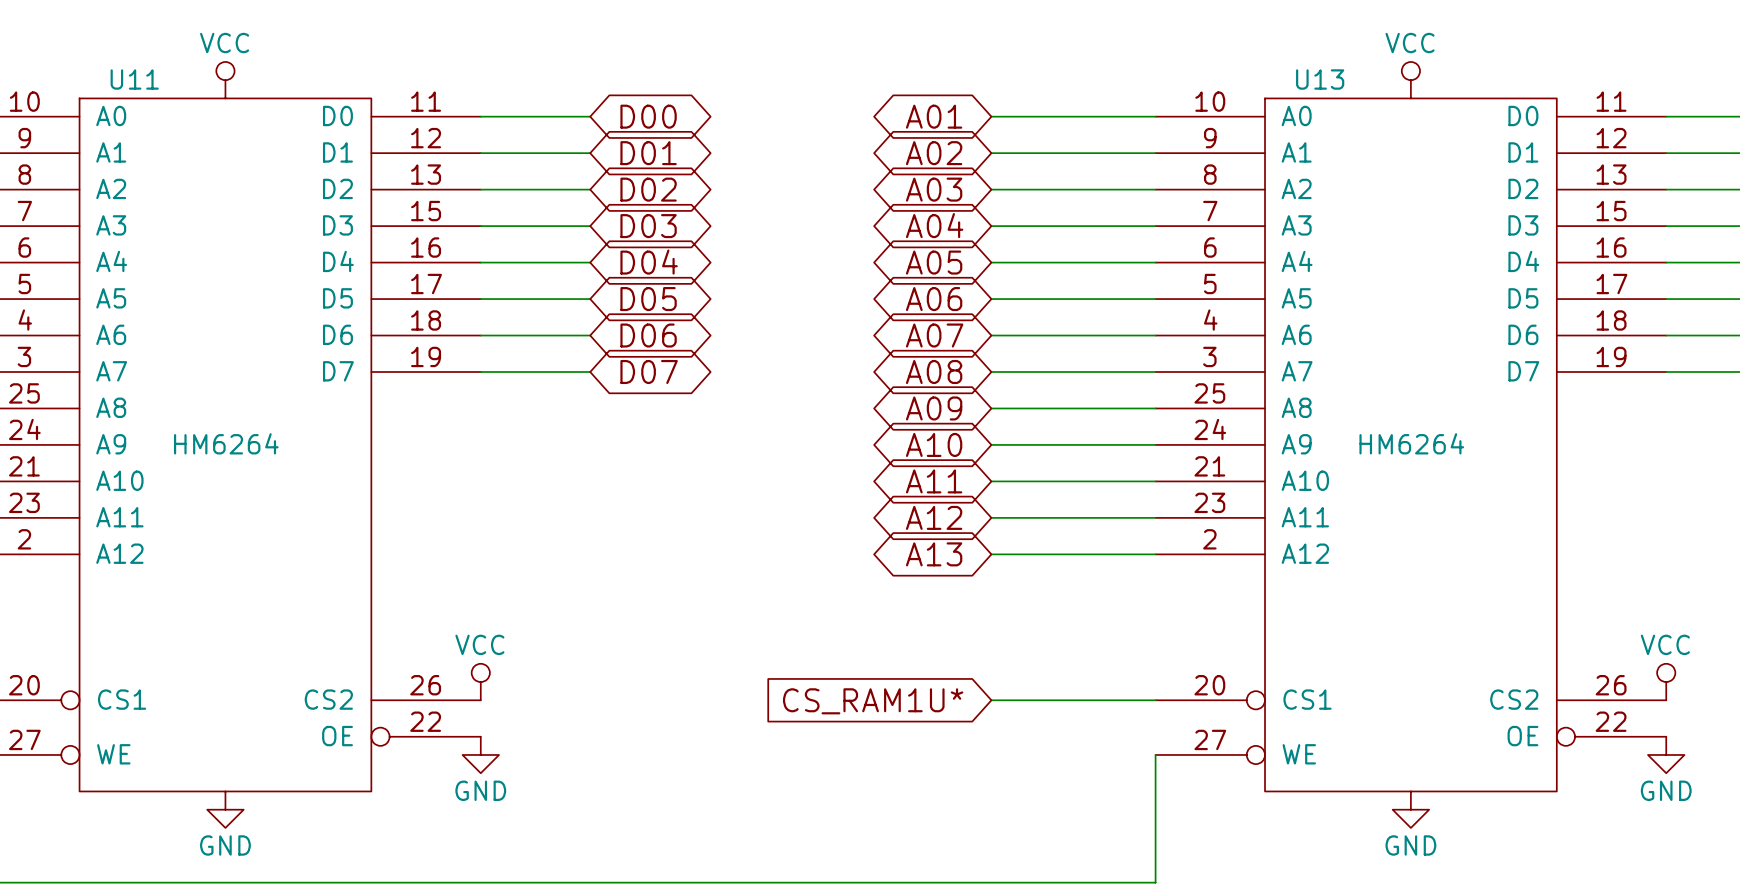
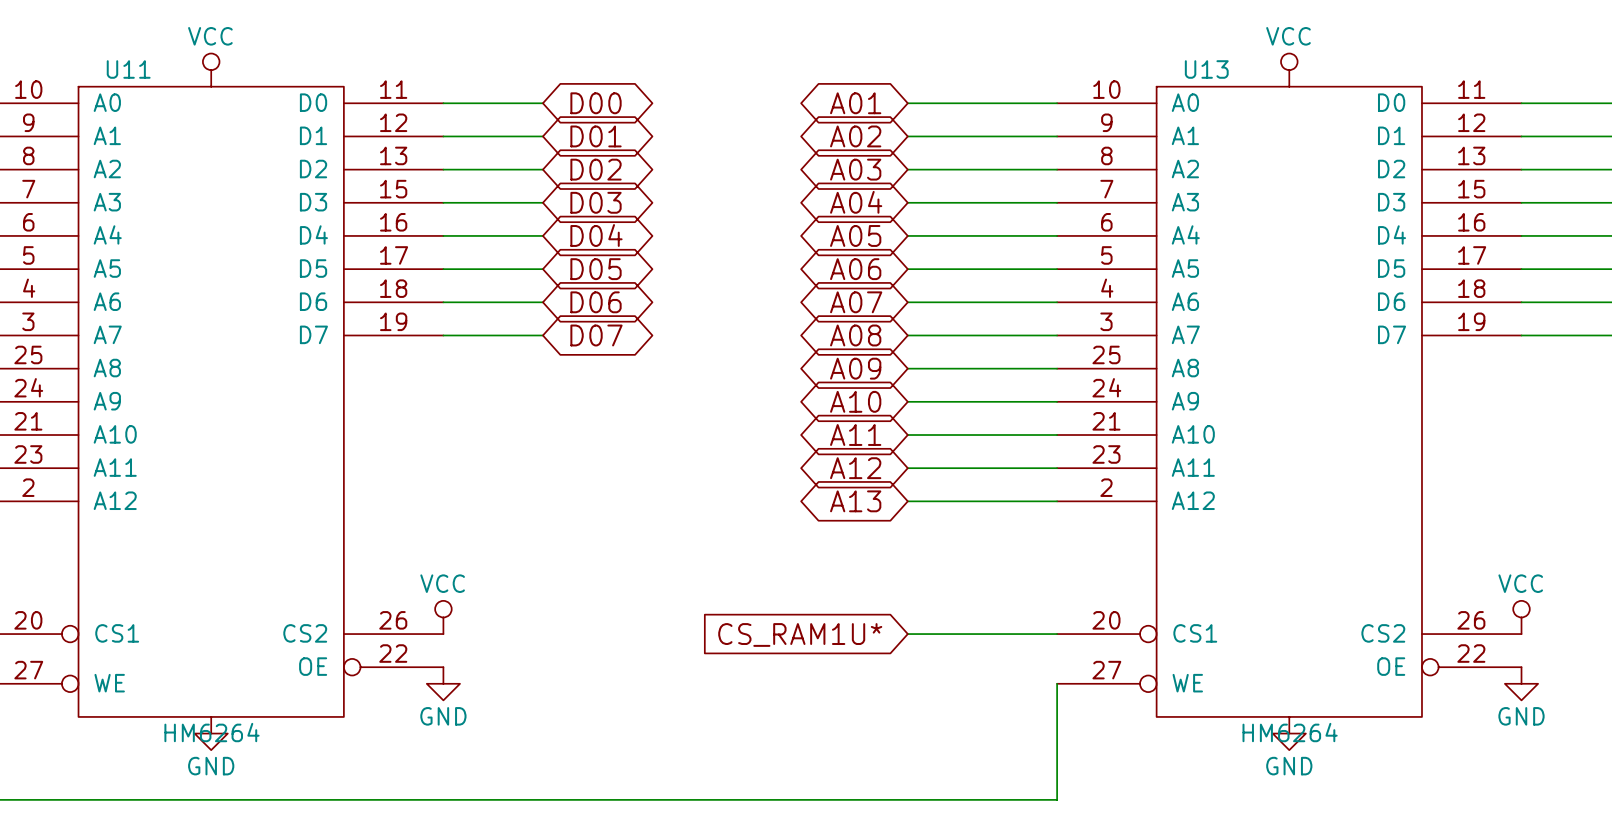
U11 value position: HM6264 (226, 443) -> HM6264 (211, 732)
U13 value position: HM6264 (1411, 443) -> HM6264 (1290, 732)

